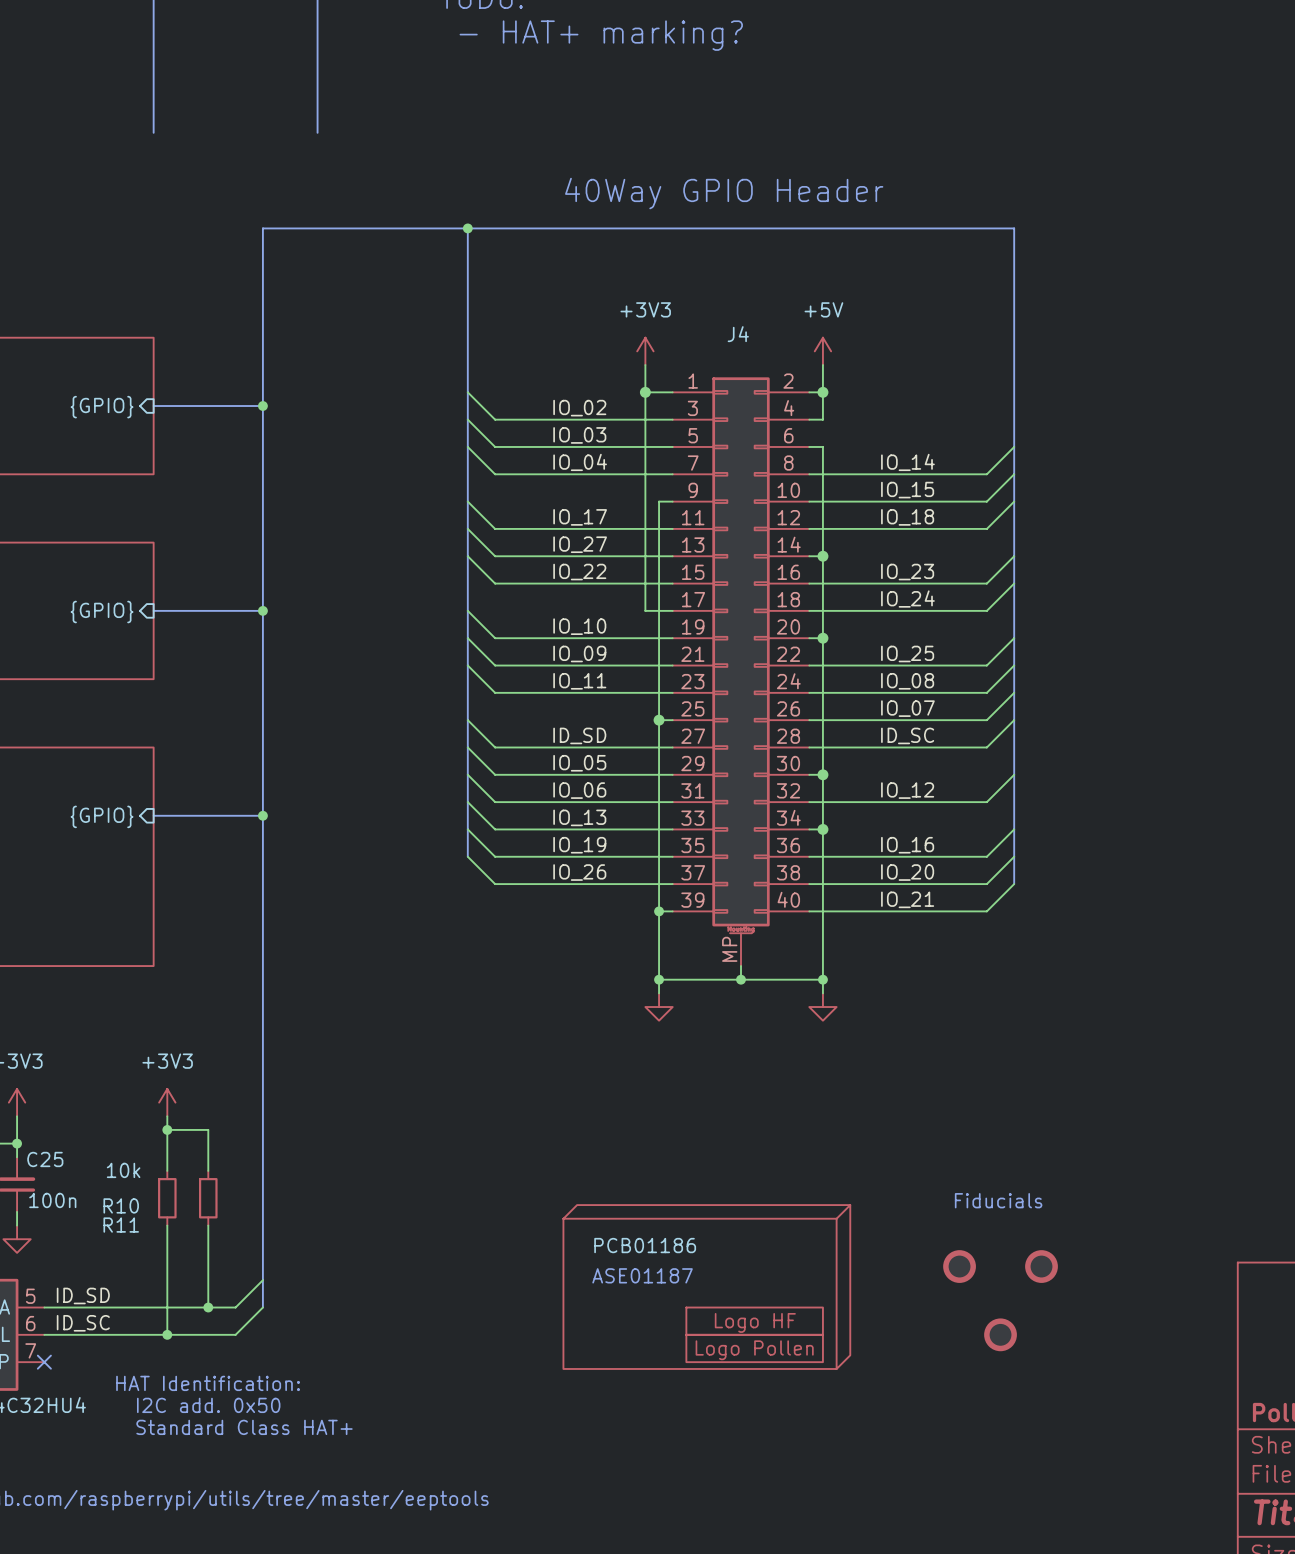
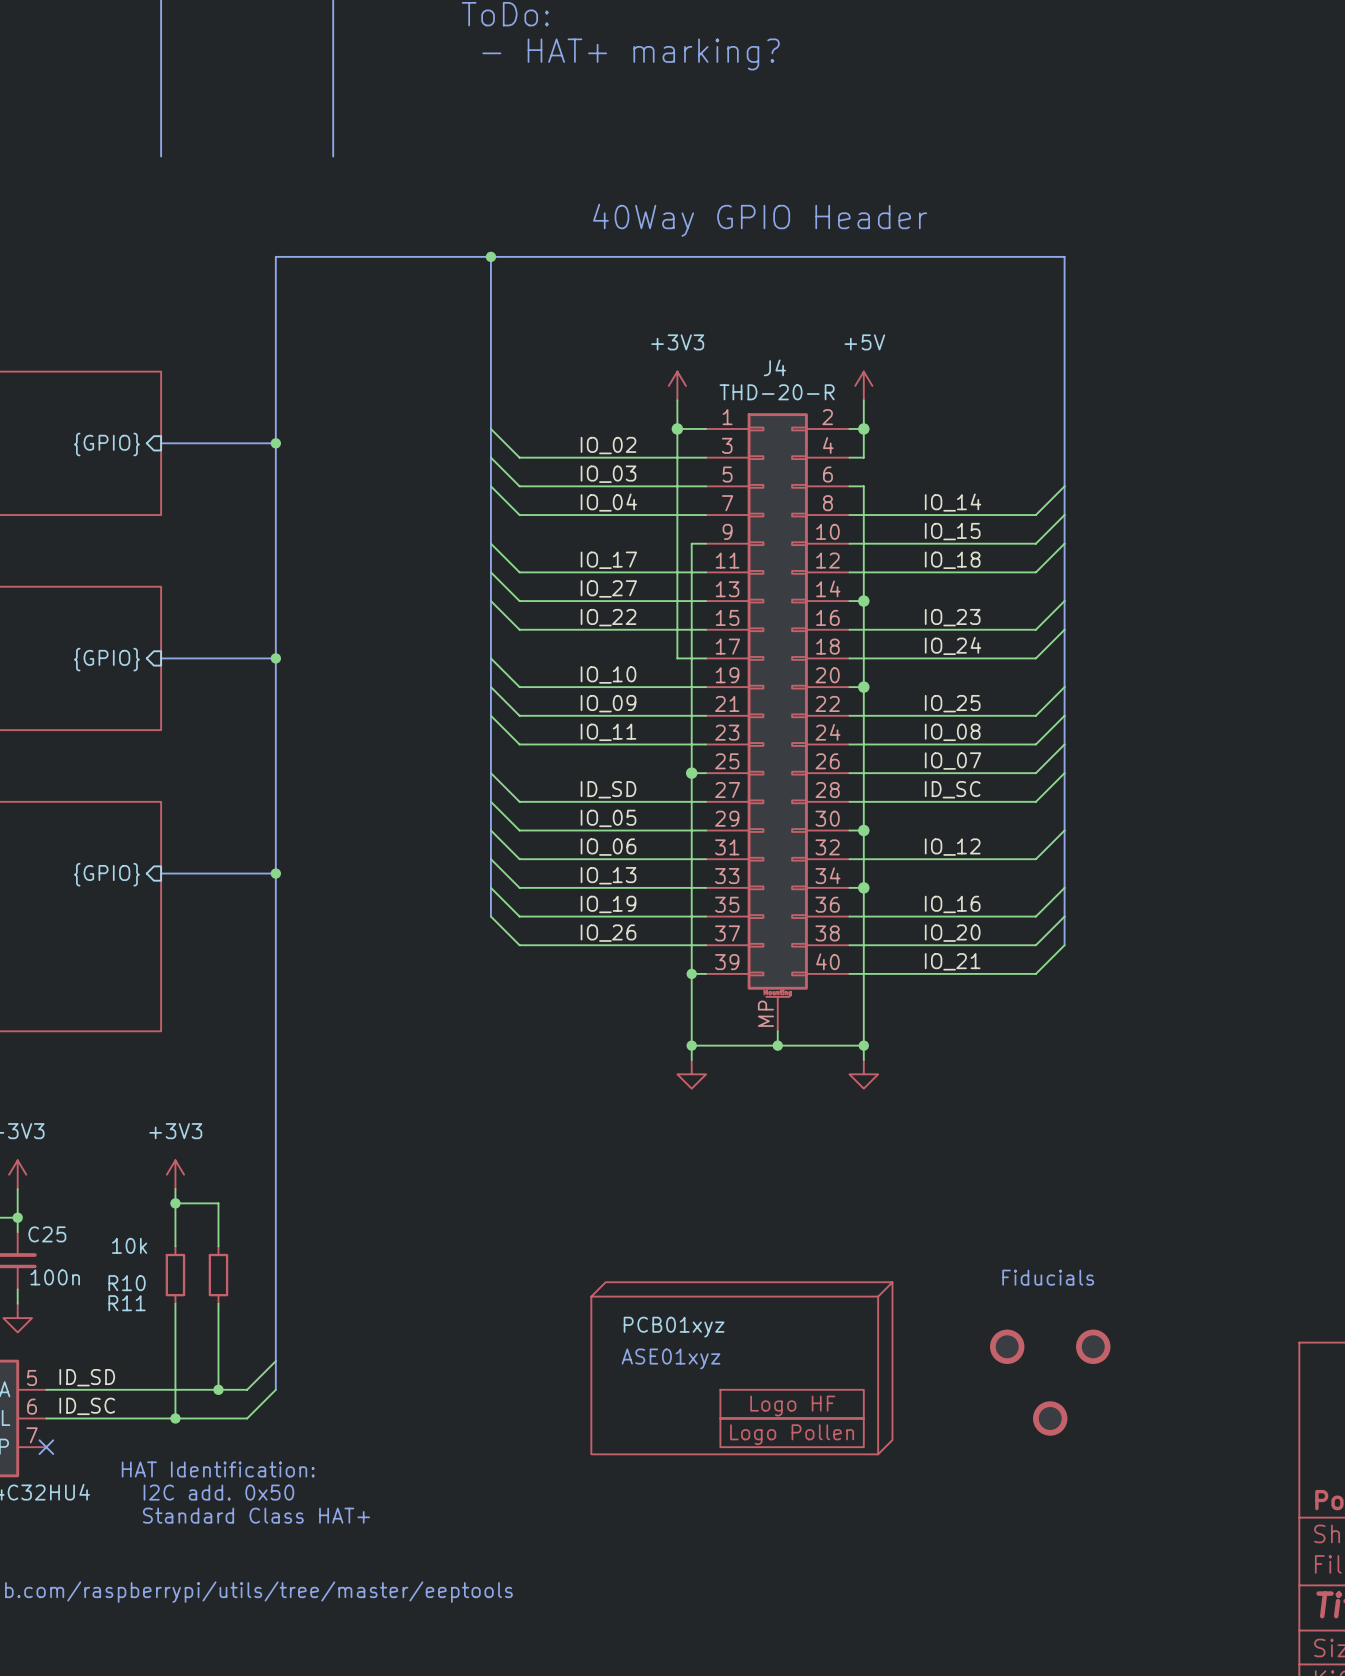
J4 value: none -> THD-20-R (777, 392)
part value: PCB01186 (645, 1245) -> PCB01xyz (674, 1327)
text: ASE01187 (642, 1275) -> ASE01xyz (670, 1358)

